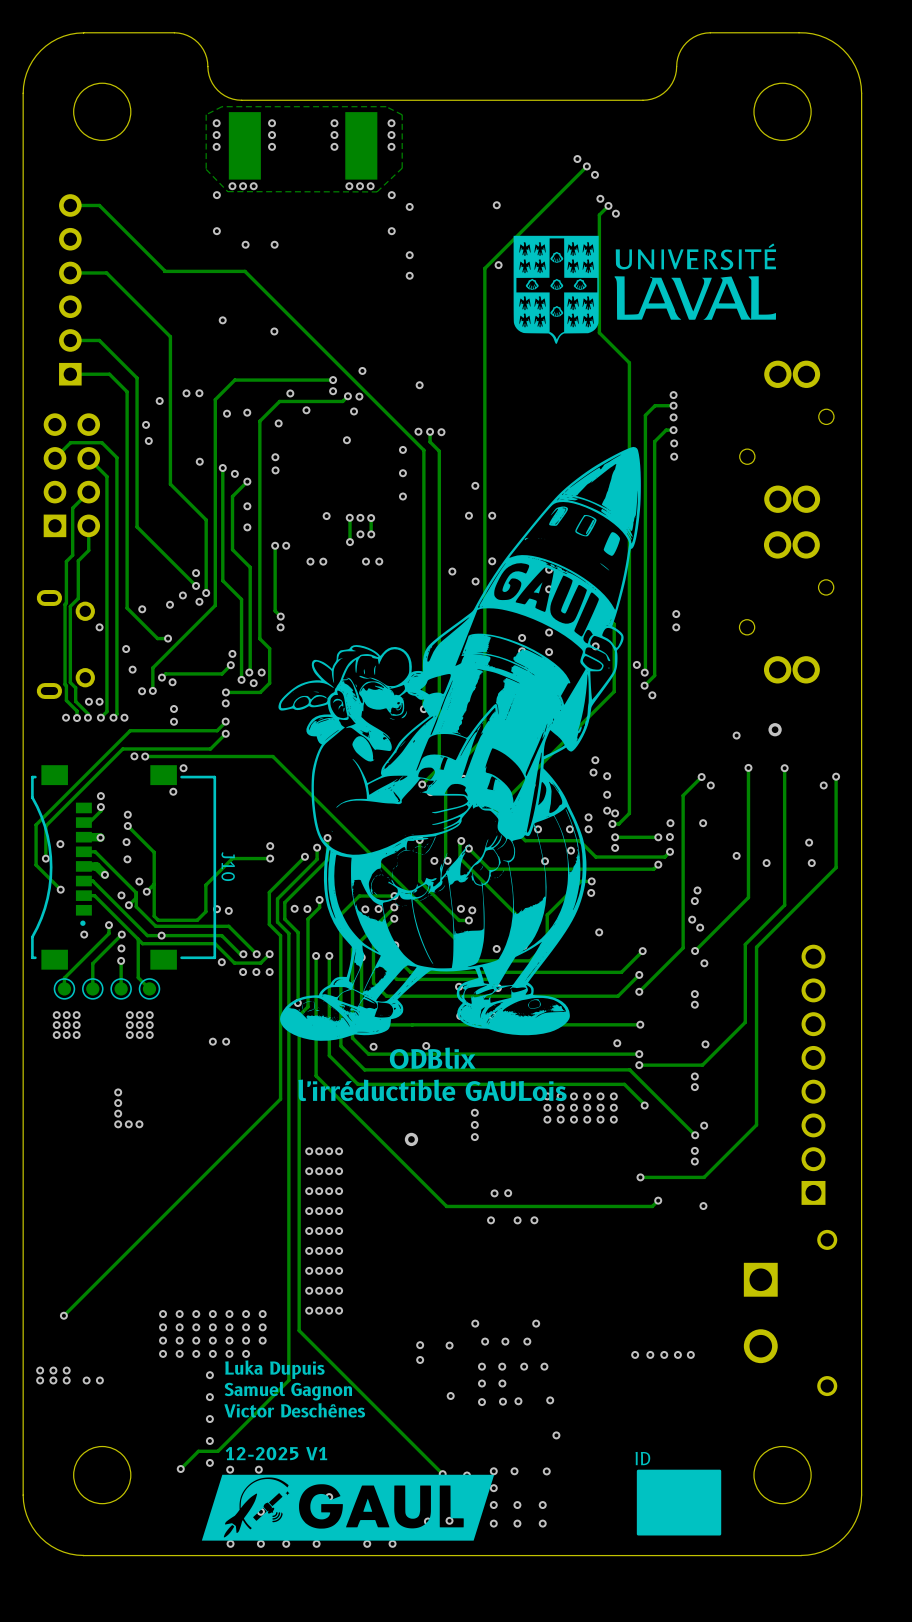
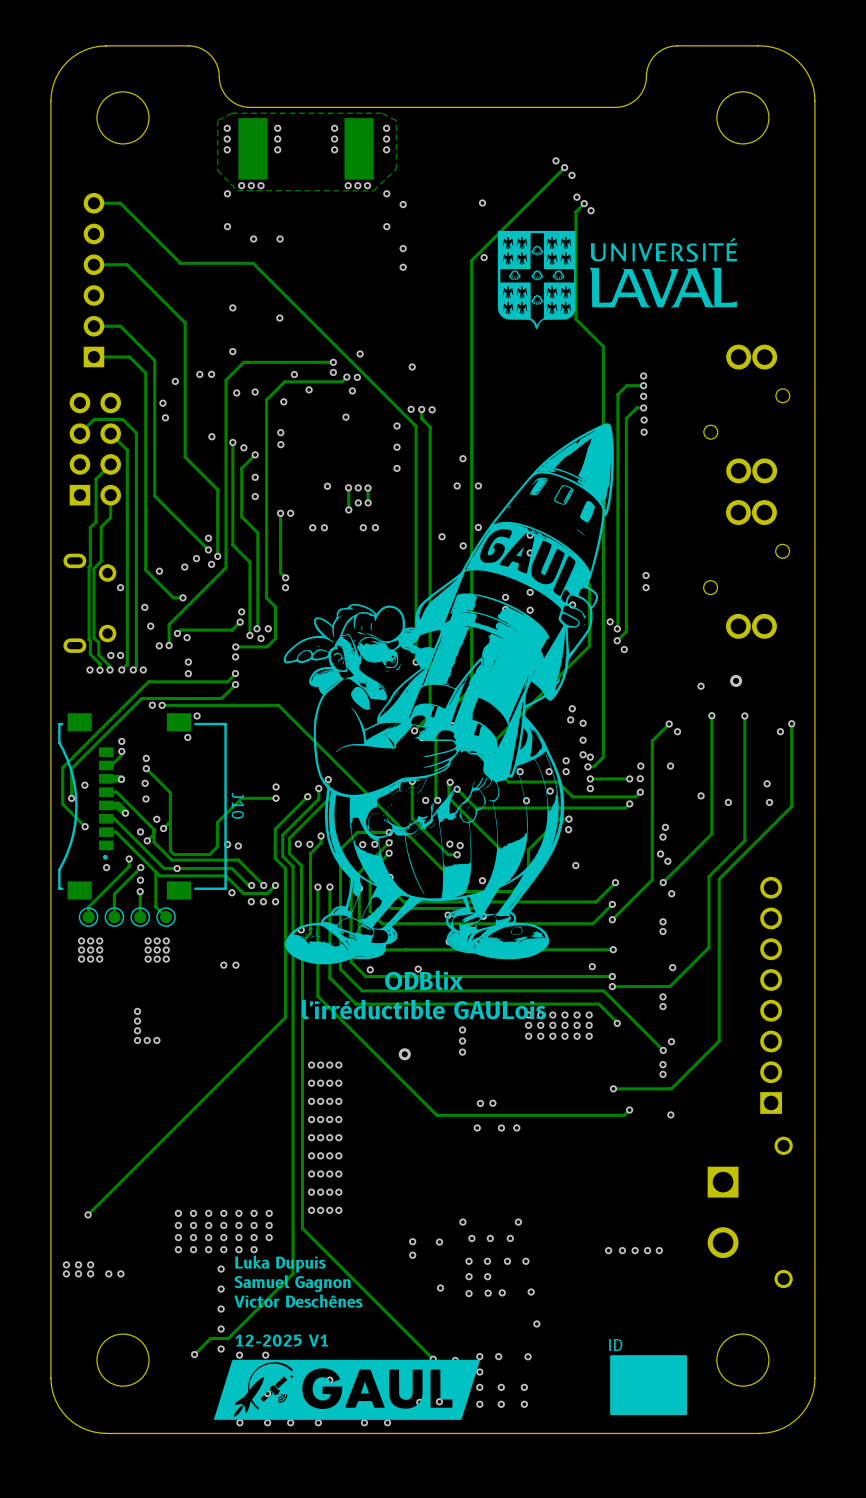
via: none -> (232, 351)

